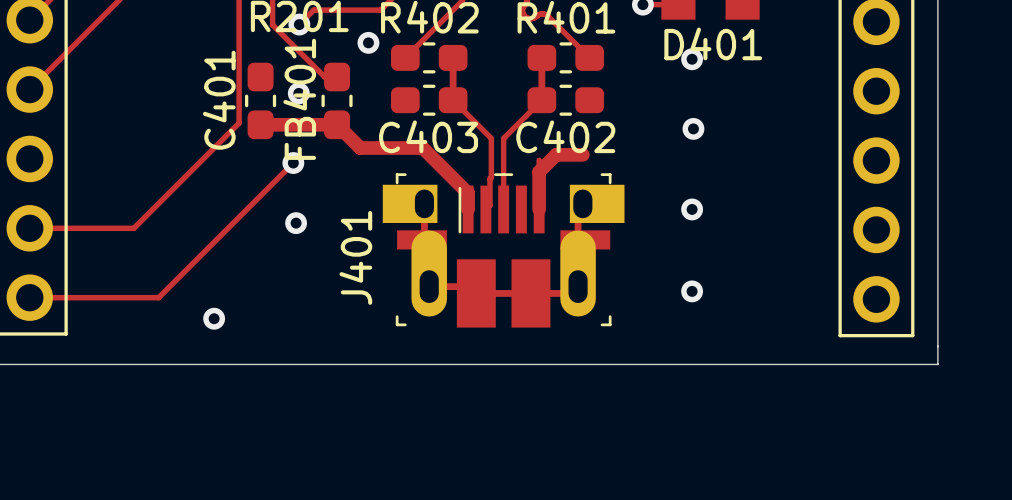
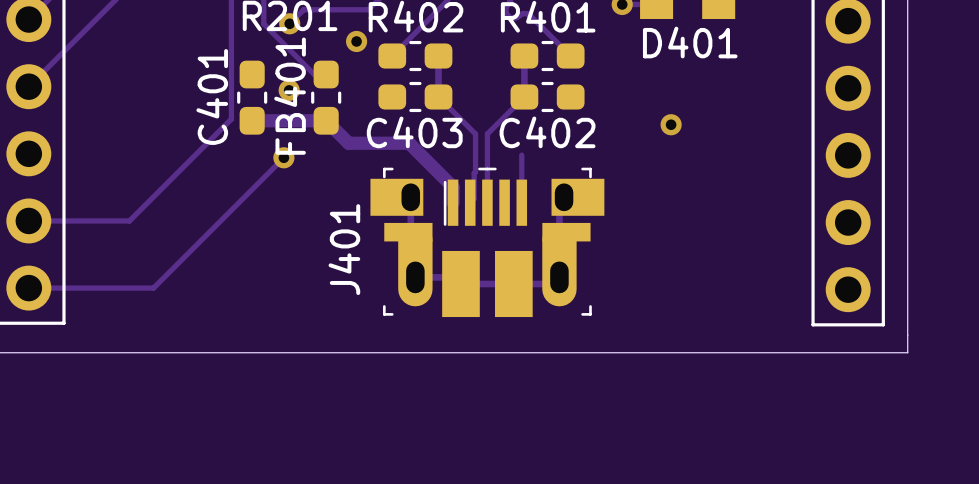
via: (692, 59) -> none
track: (582, 154) (556, 154) (539, 171) (539, 209) -> none
via: (692, 209) -> none
via: (296, 223) -> none
via: (692, 291) -> none
via: (214, 318) -> none

